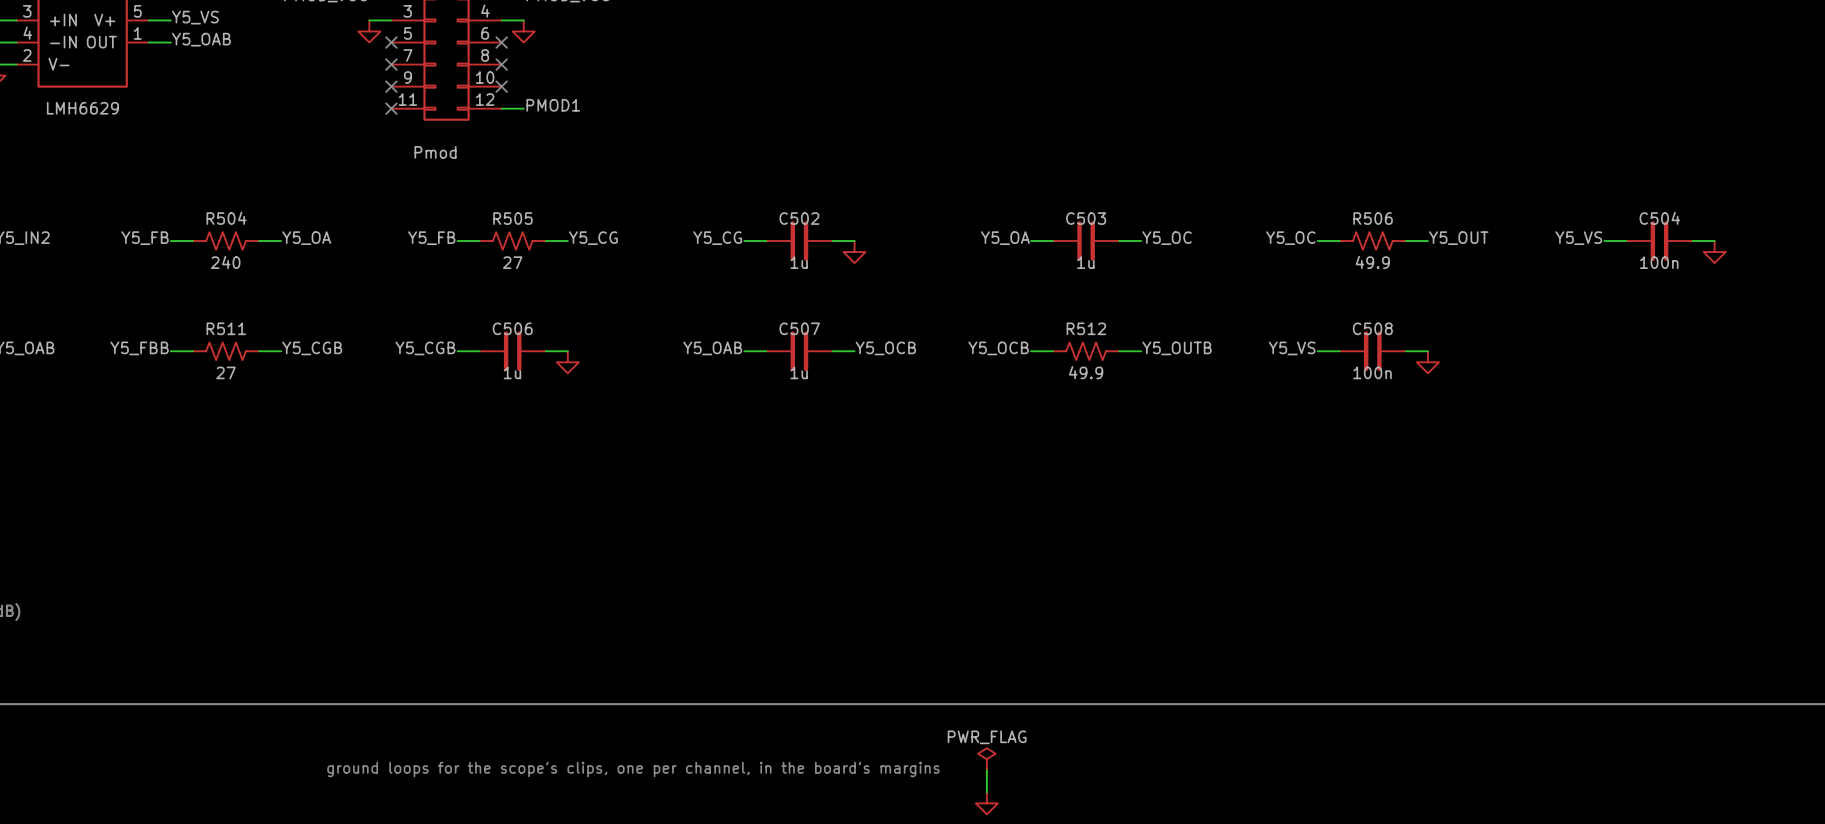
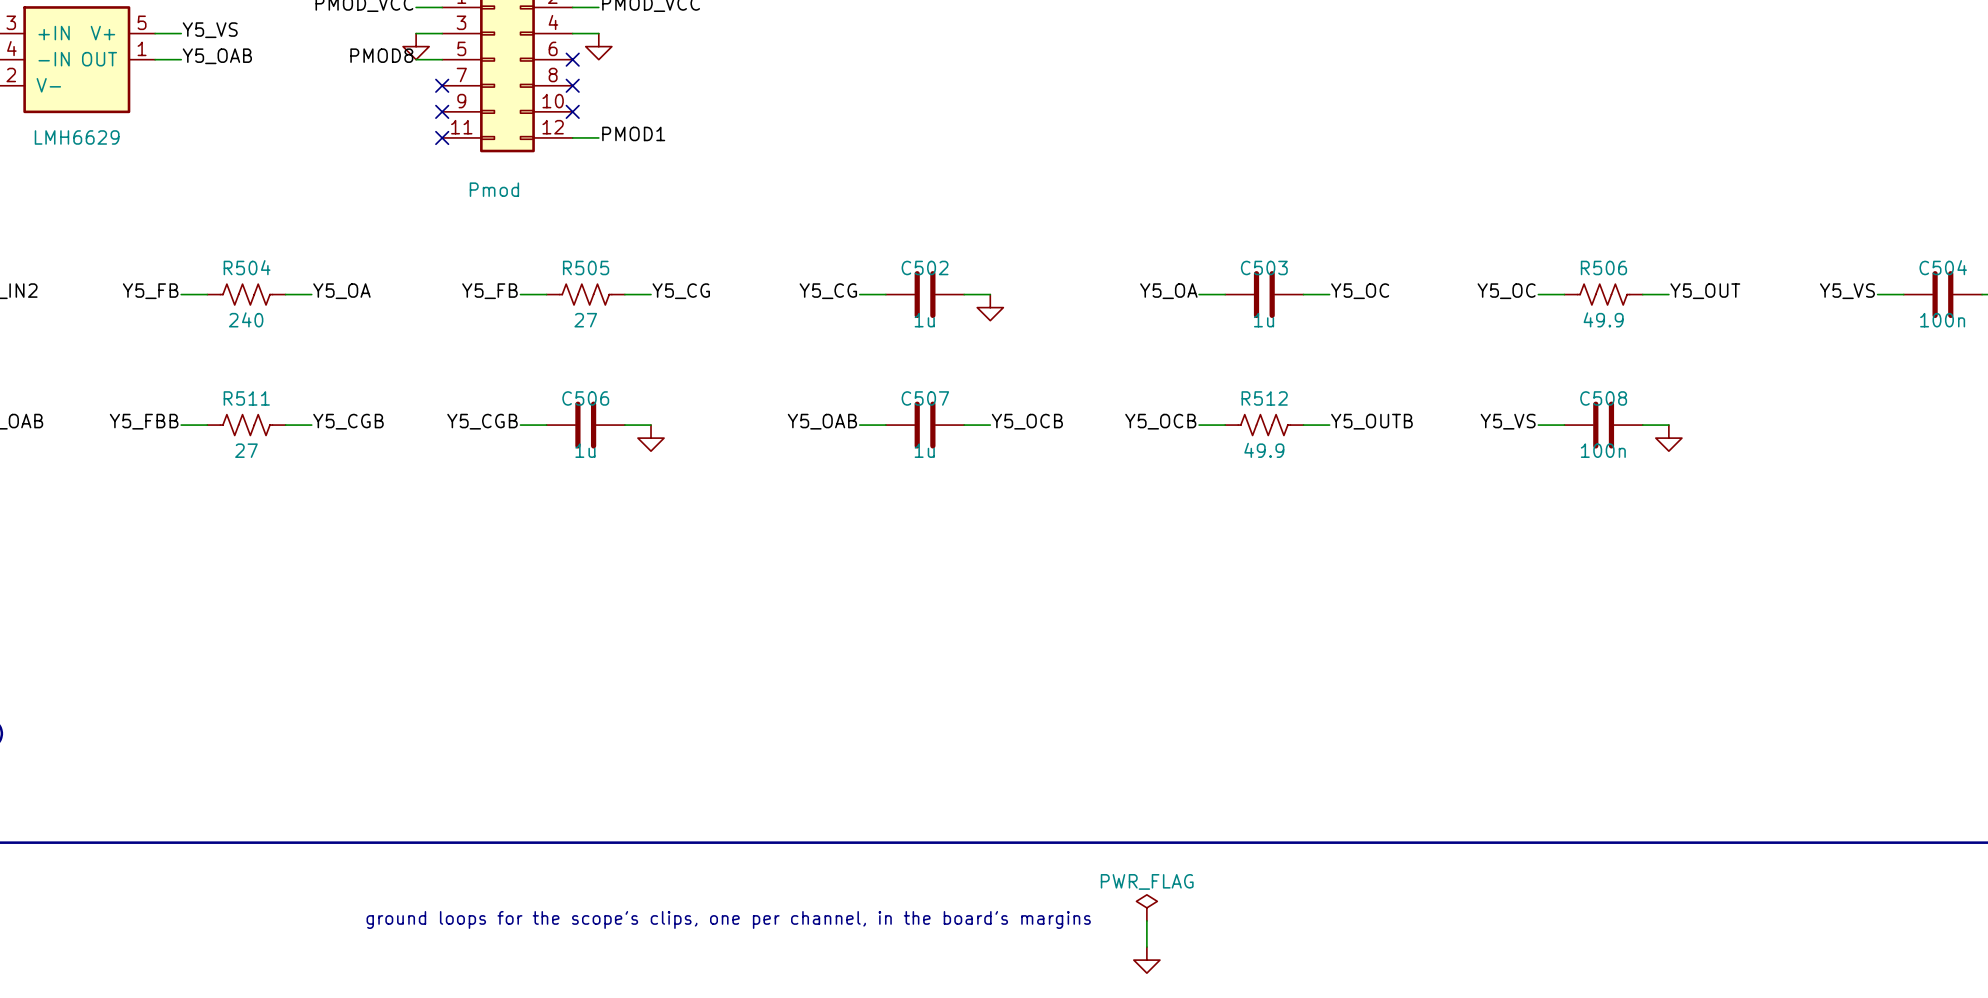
label: none -> PMOD8 (381, 55)
wire: none -> (416, 59) (442, 59)
no-connect mark: (391, 42) -> none

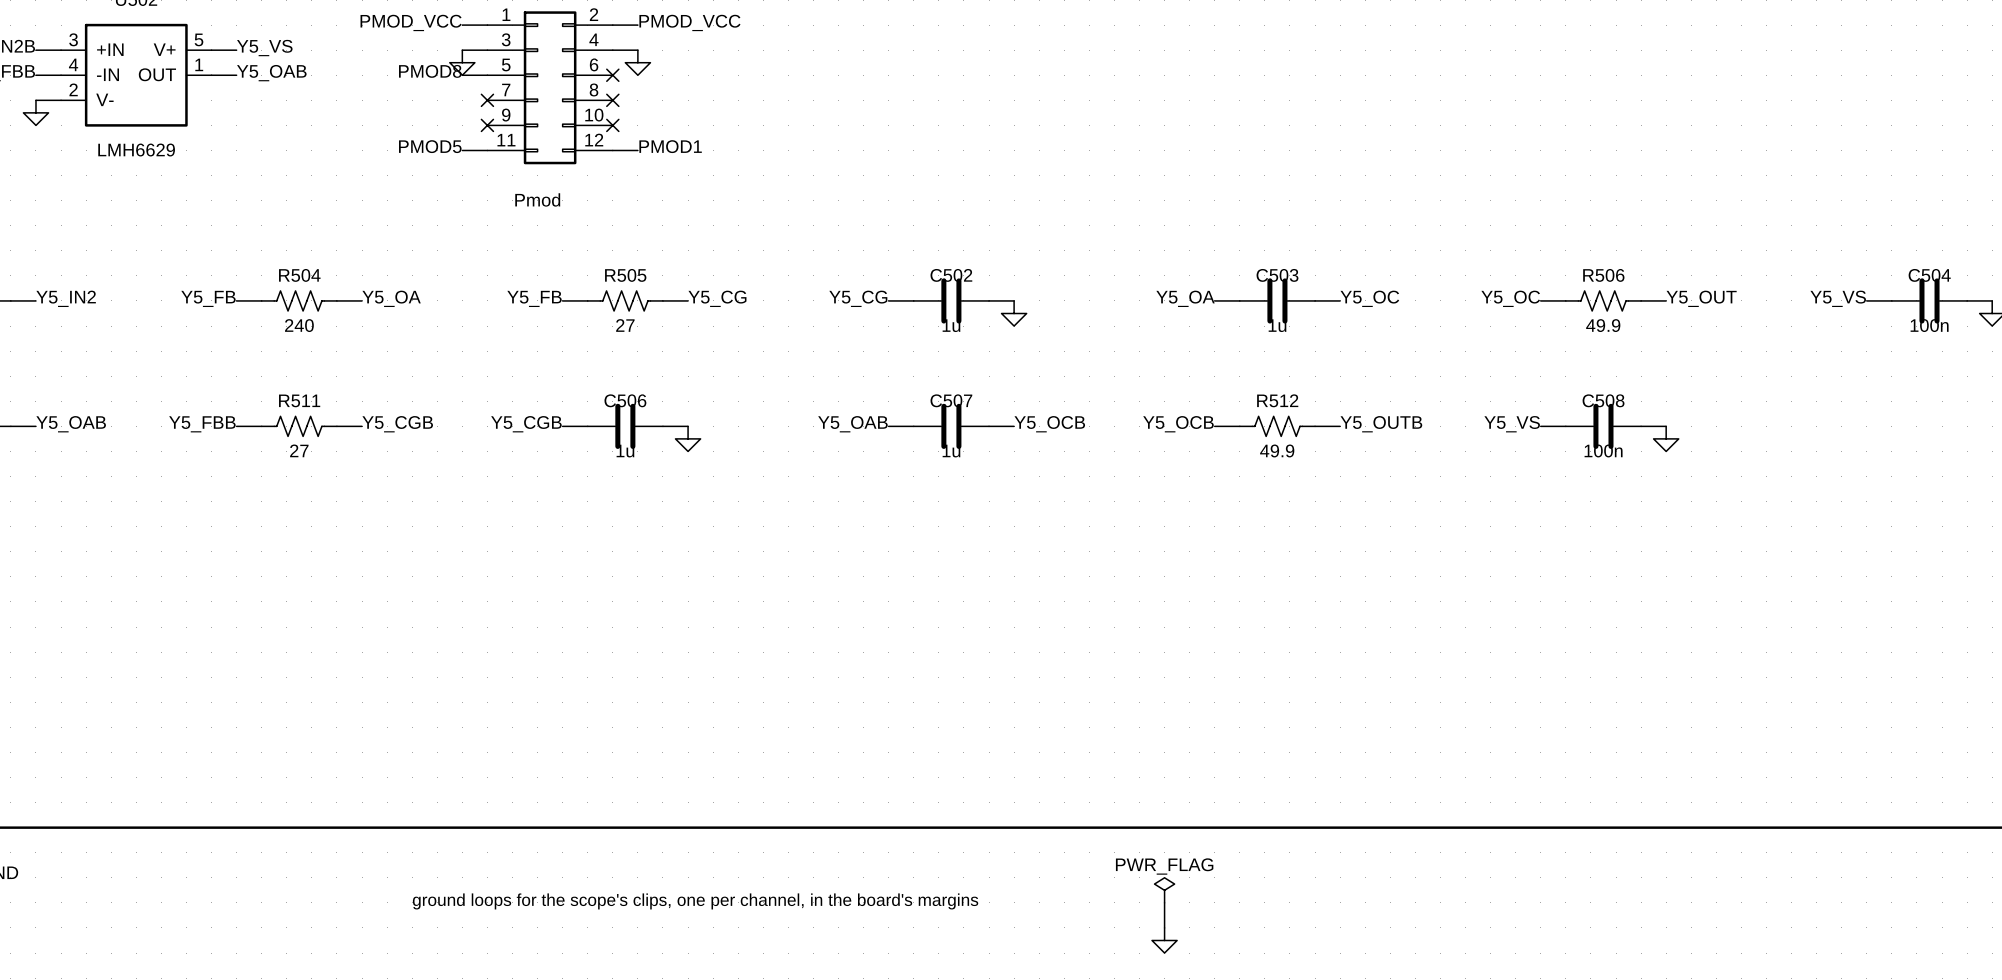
label: none -> PMOD5 (430, 146)
wire: none -> (462, 150) (487, 150)
no-connect mark: (442, 137) -> none

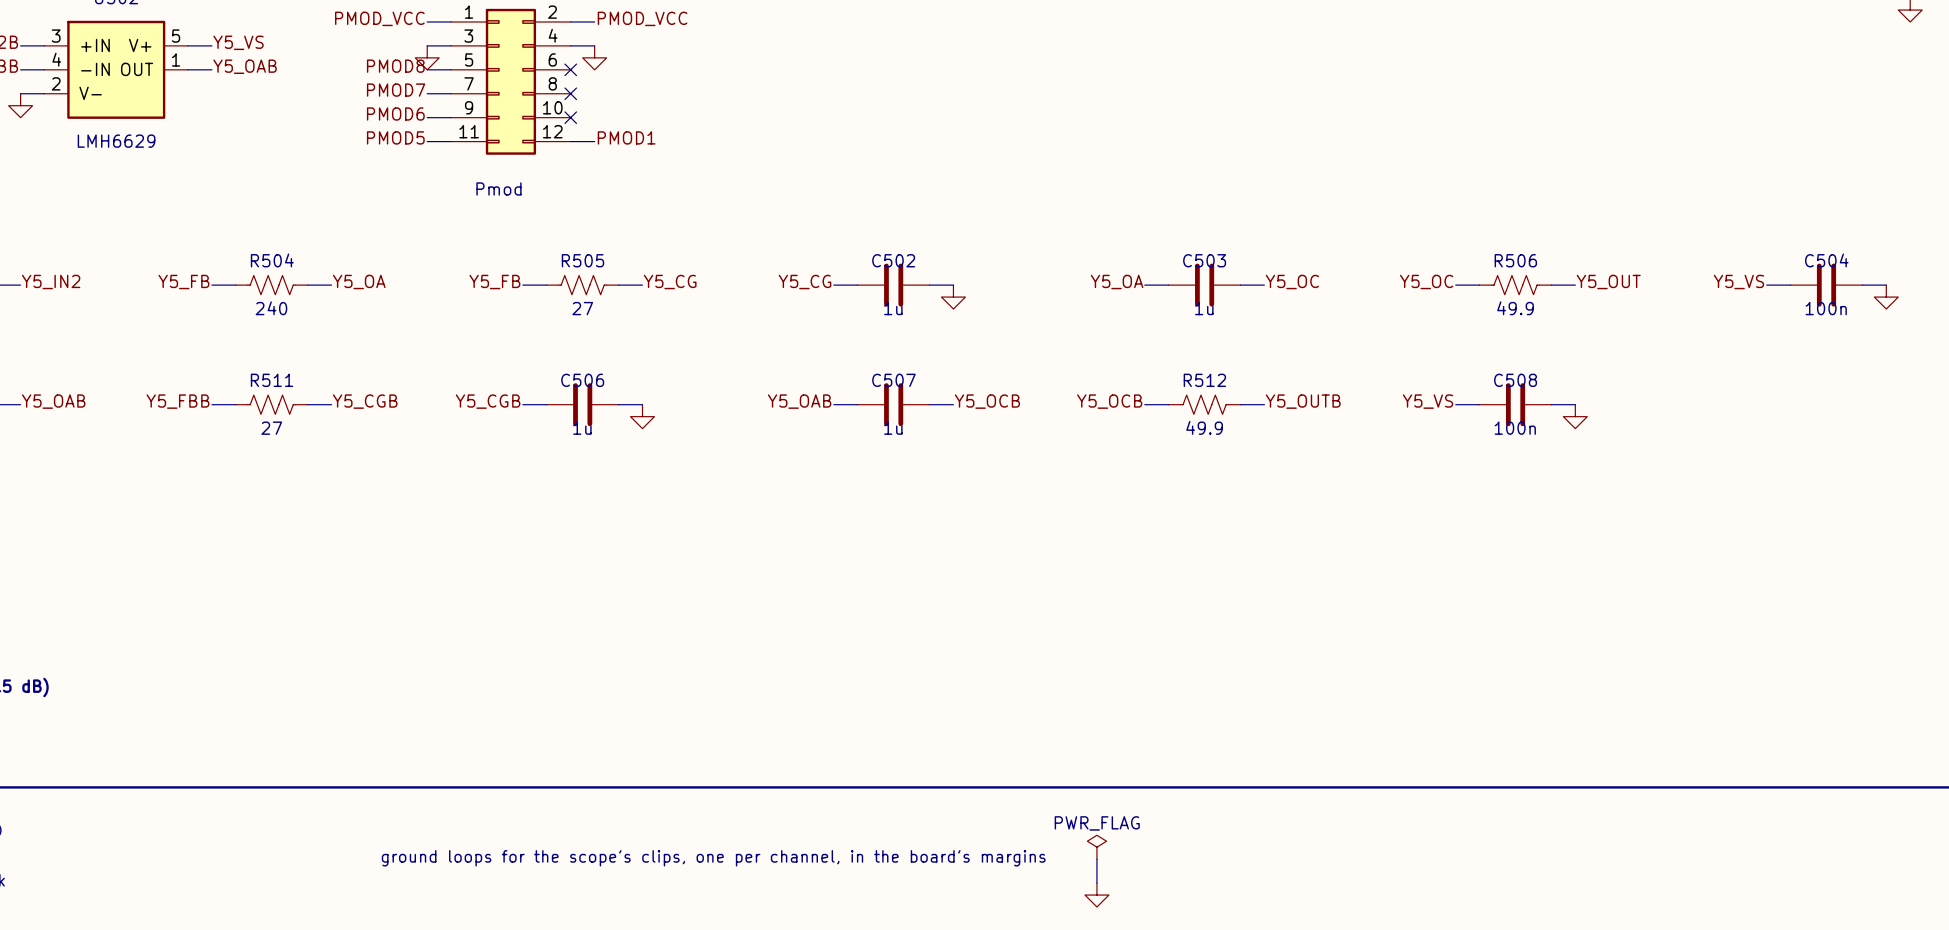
label: none -> PMOD7 (396, 90)
wire: none -> (427, 93) (451, 93)
no-connect mark: (487, 100) -> none
label: none -> PMOD6 (395, 113)
wire: none -> (427, 117) (451, 117)
no-connect mark: (487, 125) -> none

